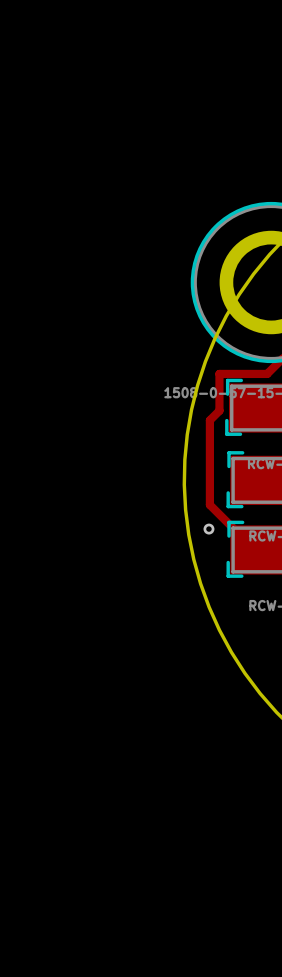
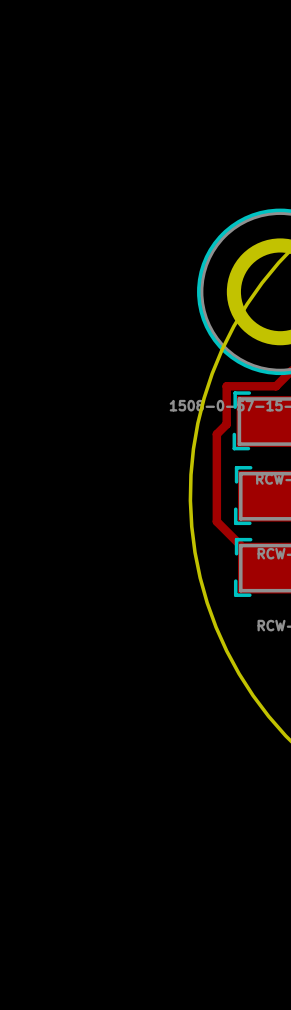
via: (208, 529) -> none

